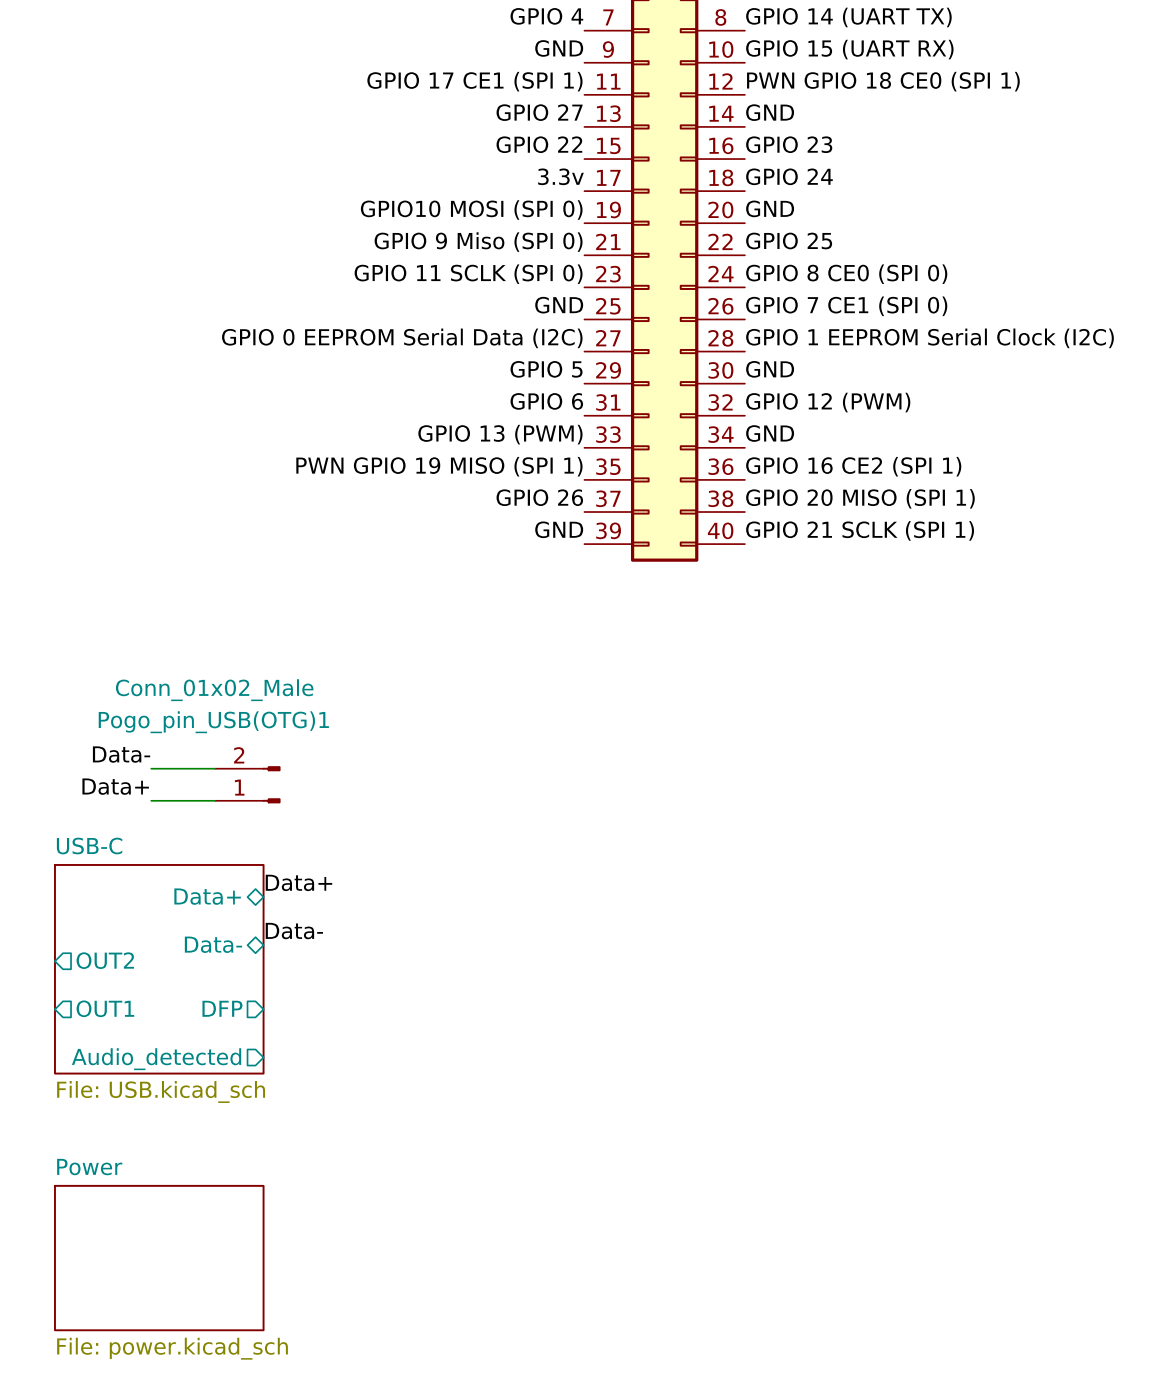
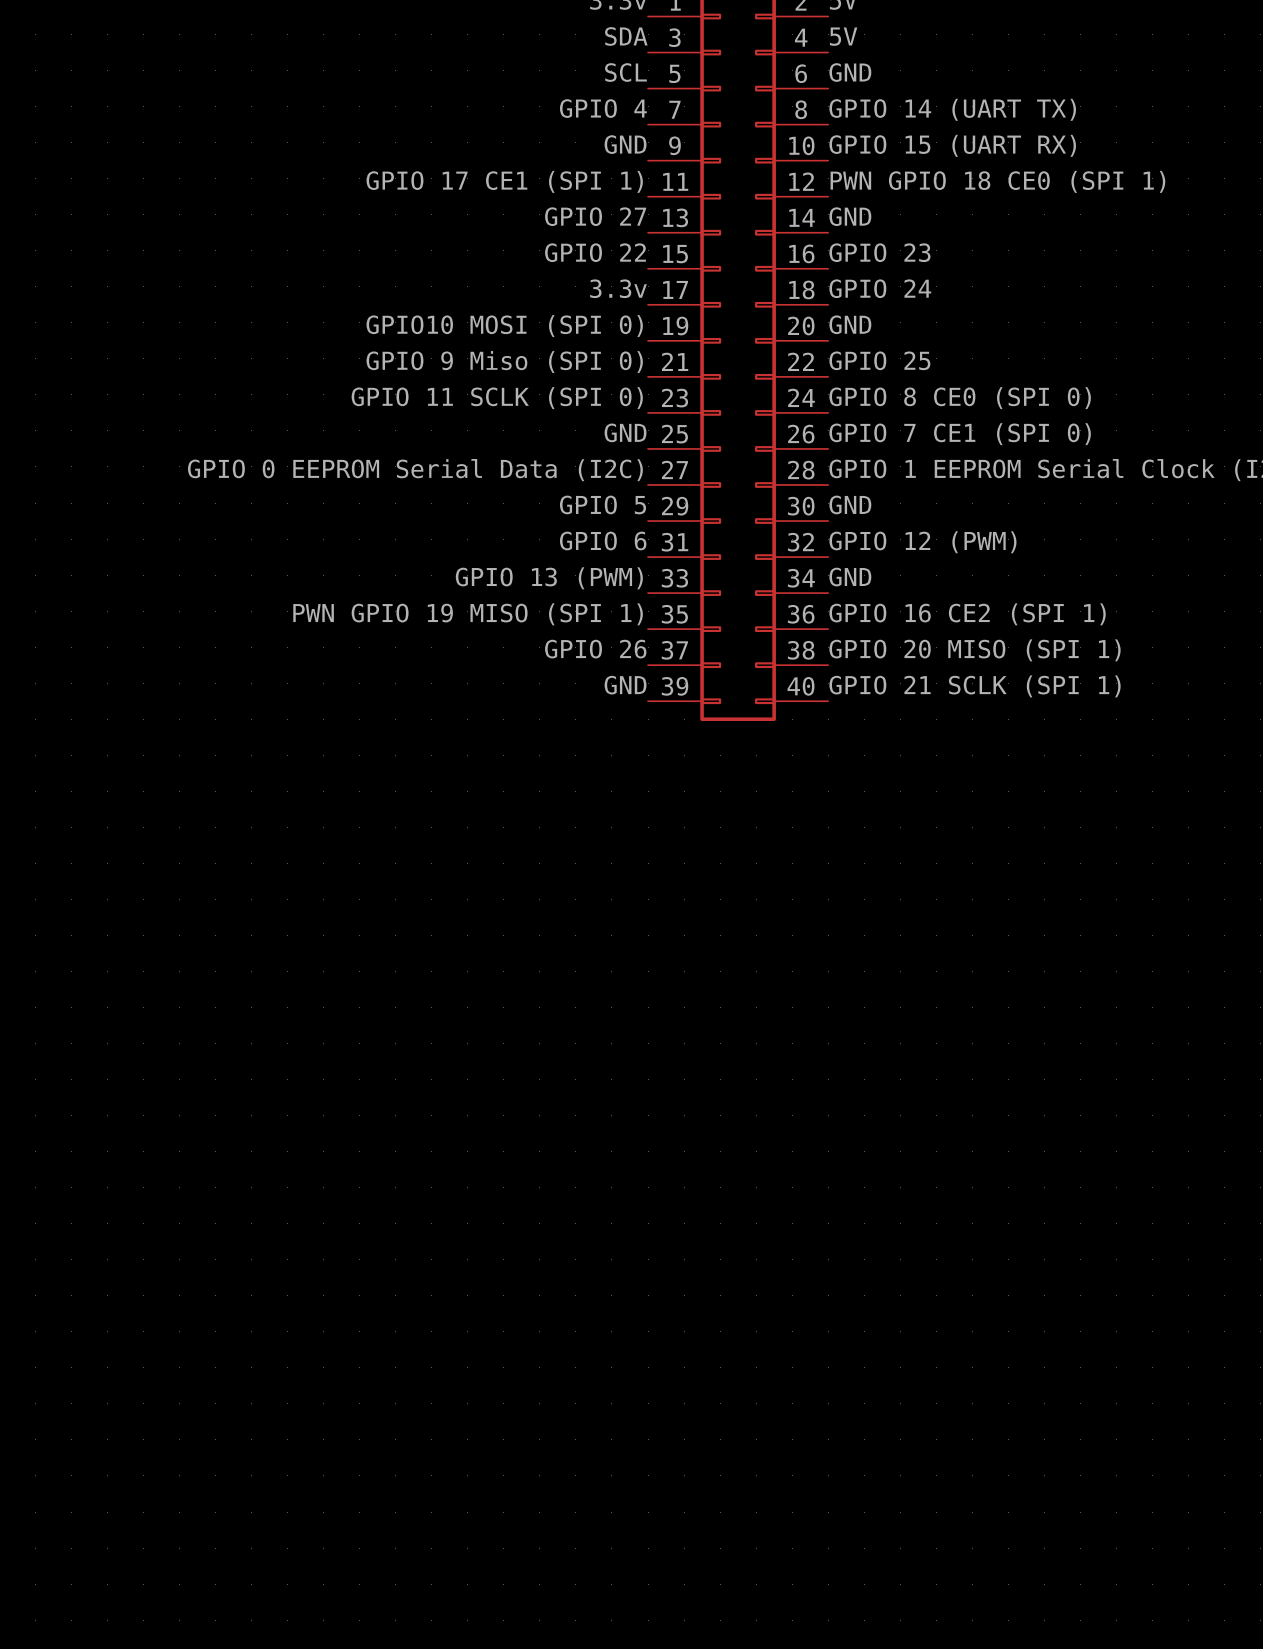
label: Data- (121, 754) -> none
wire: (151, 768) (215, 768) -> none
Pogo_pin_USB(OTG)1: Conn_01x02_Male (247, 784) -> none
label: Data+ (115, 786) -> none
wire: (151, 800) (215, 800) -> none
label: Data+ (298, 882) -> none
sheet pin: Data+ (207, 896) -> none
label: Data- (294, 931) -> none
sheet pin: Data- (213, 944) -> none
sheet pin: OUT2 (105, 960) -> none
sheet USB-C: File: USB.kicad_sch (159, 969) -> none
sheet pin: OUT1 (105, 1008) -> none
sheet pin: DFP (222, 1008) -> none
sheet pin: Audio_detected (156, 1059) -> none
sheet Power: File: power.kicad_sch (159, 1258) -> none

